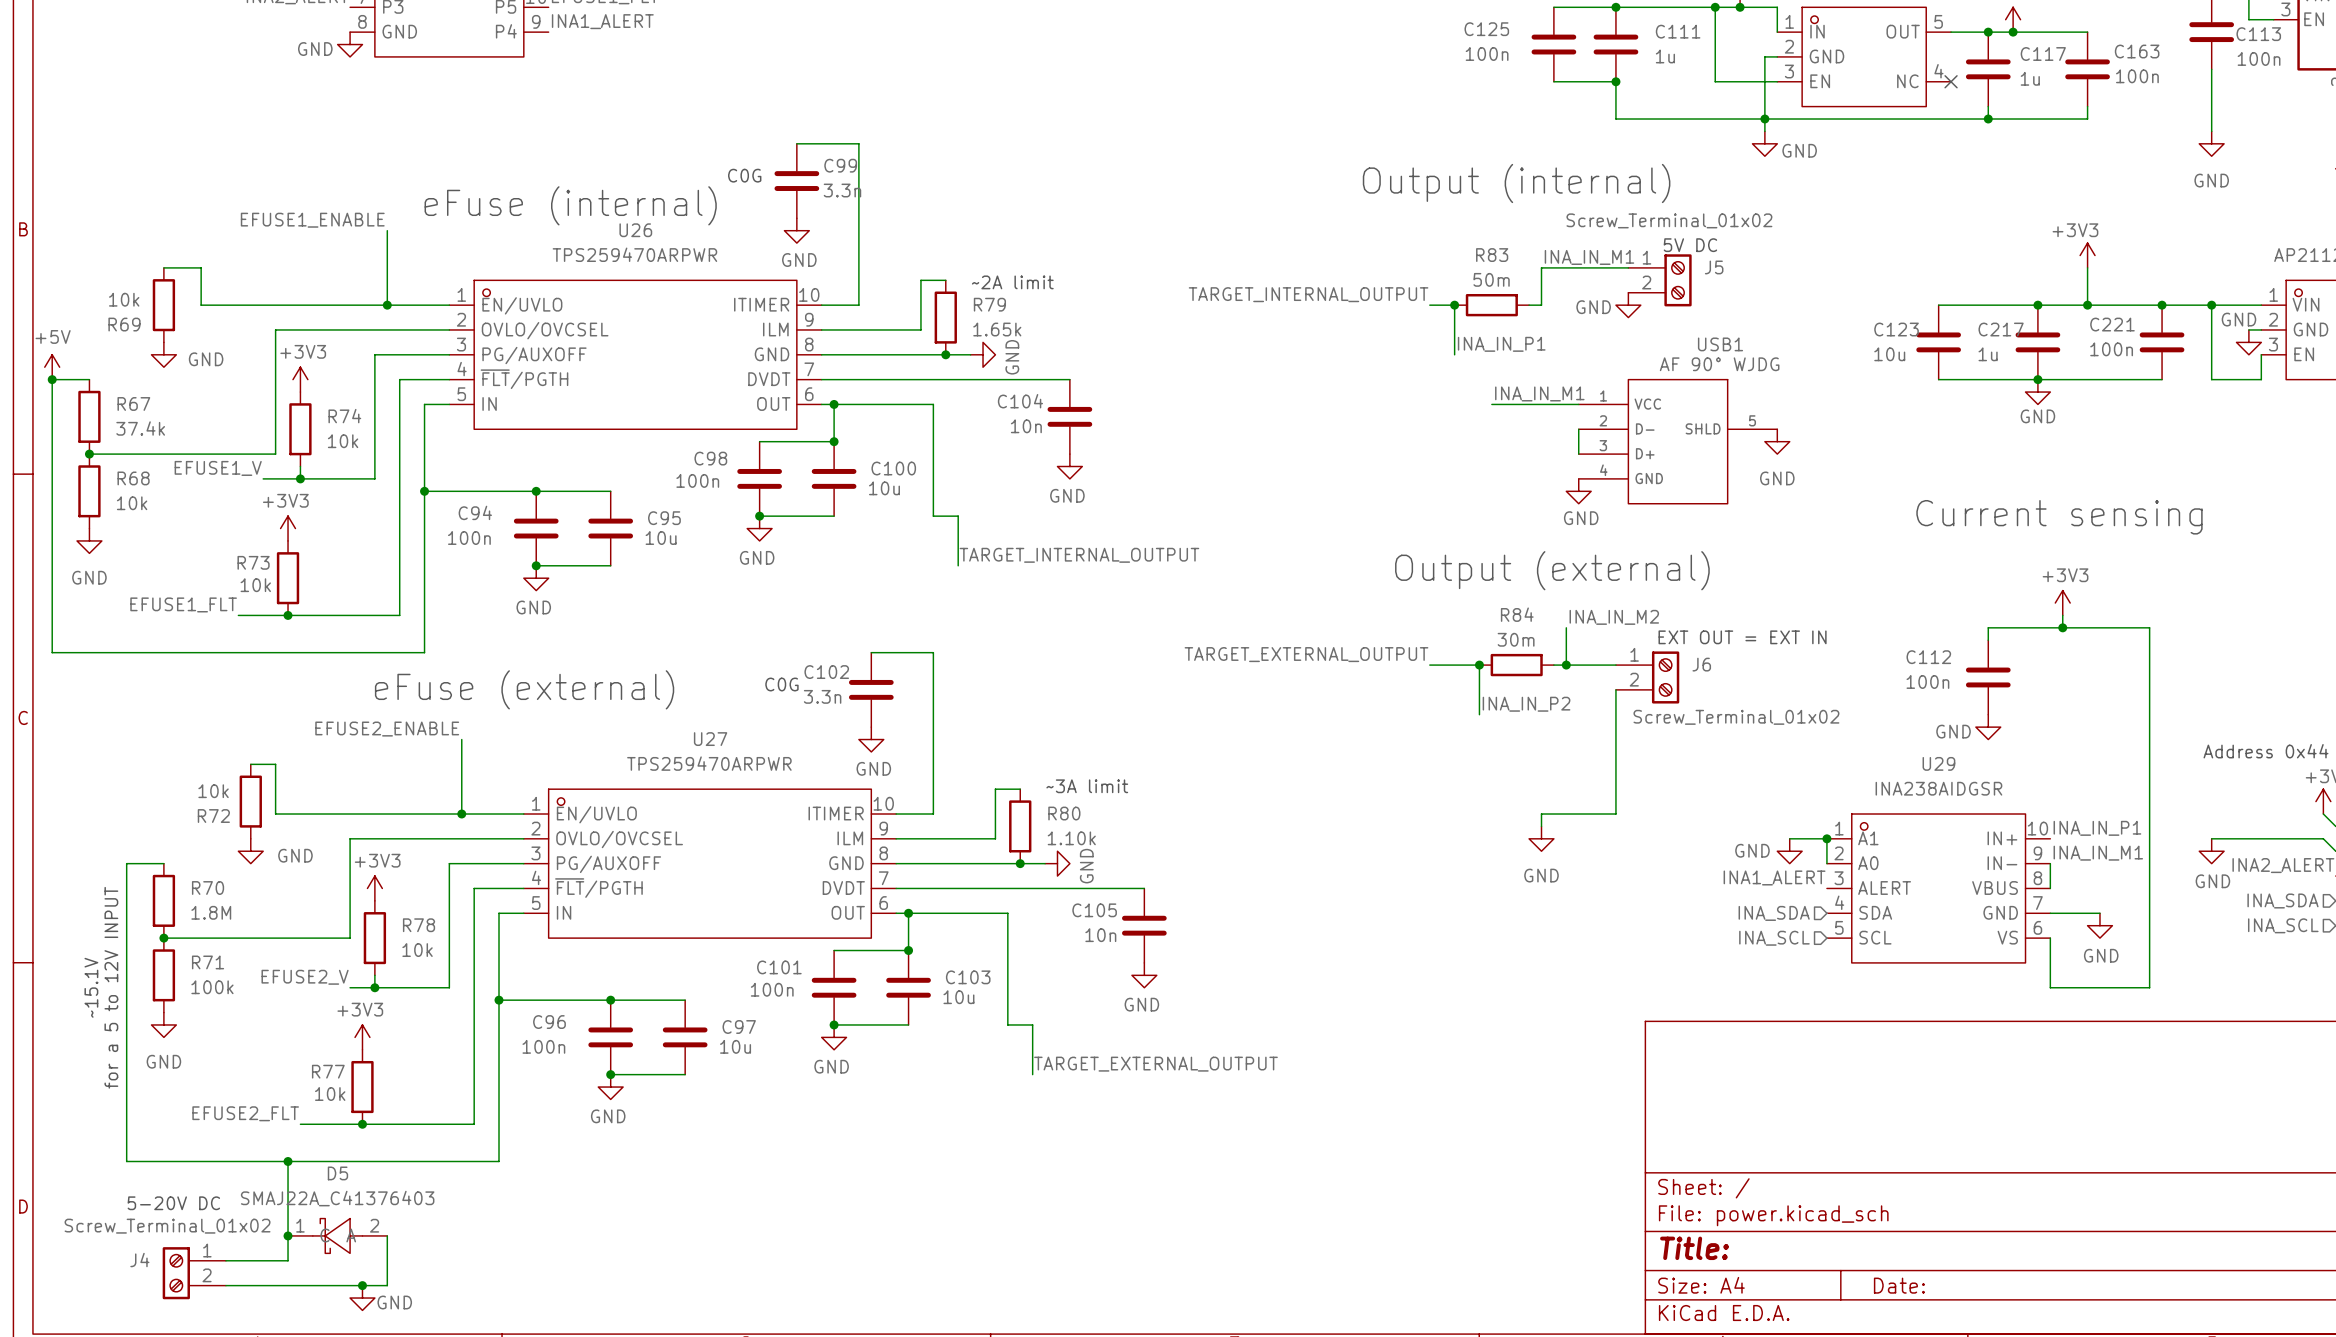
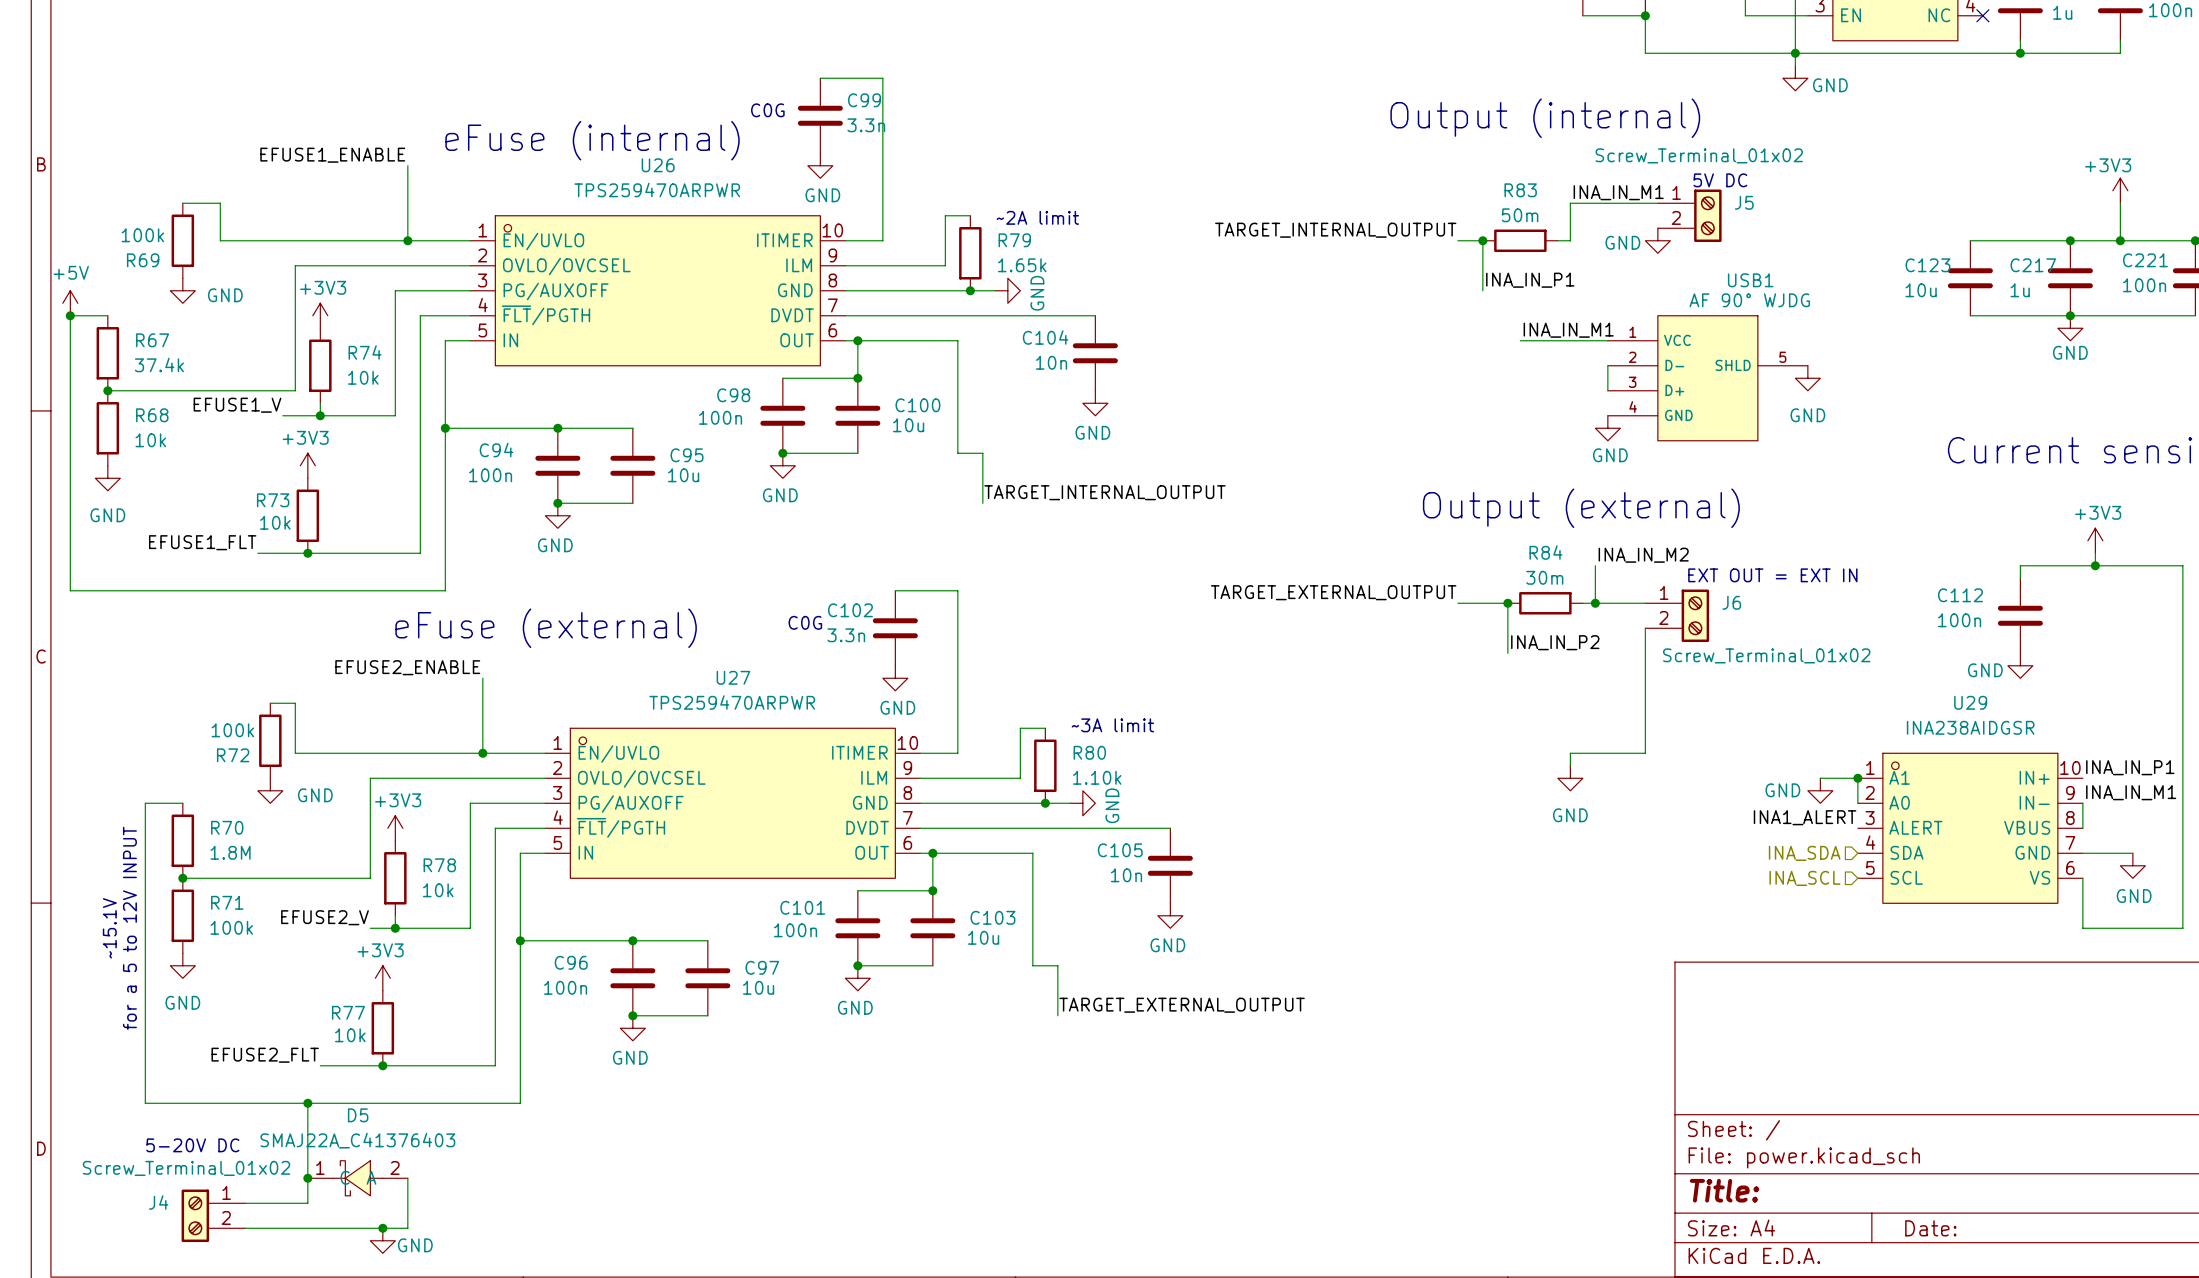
R69 value: 10k (124, 299) -> 100k (142, 235)
R72 value: 10k (213, 791) -> 100k (232, 730)

